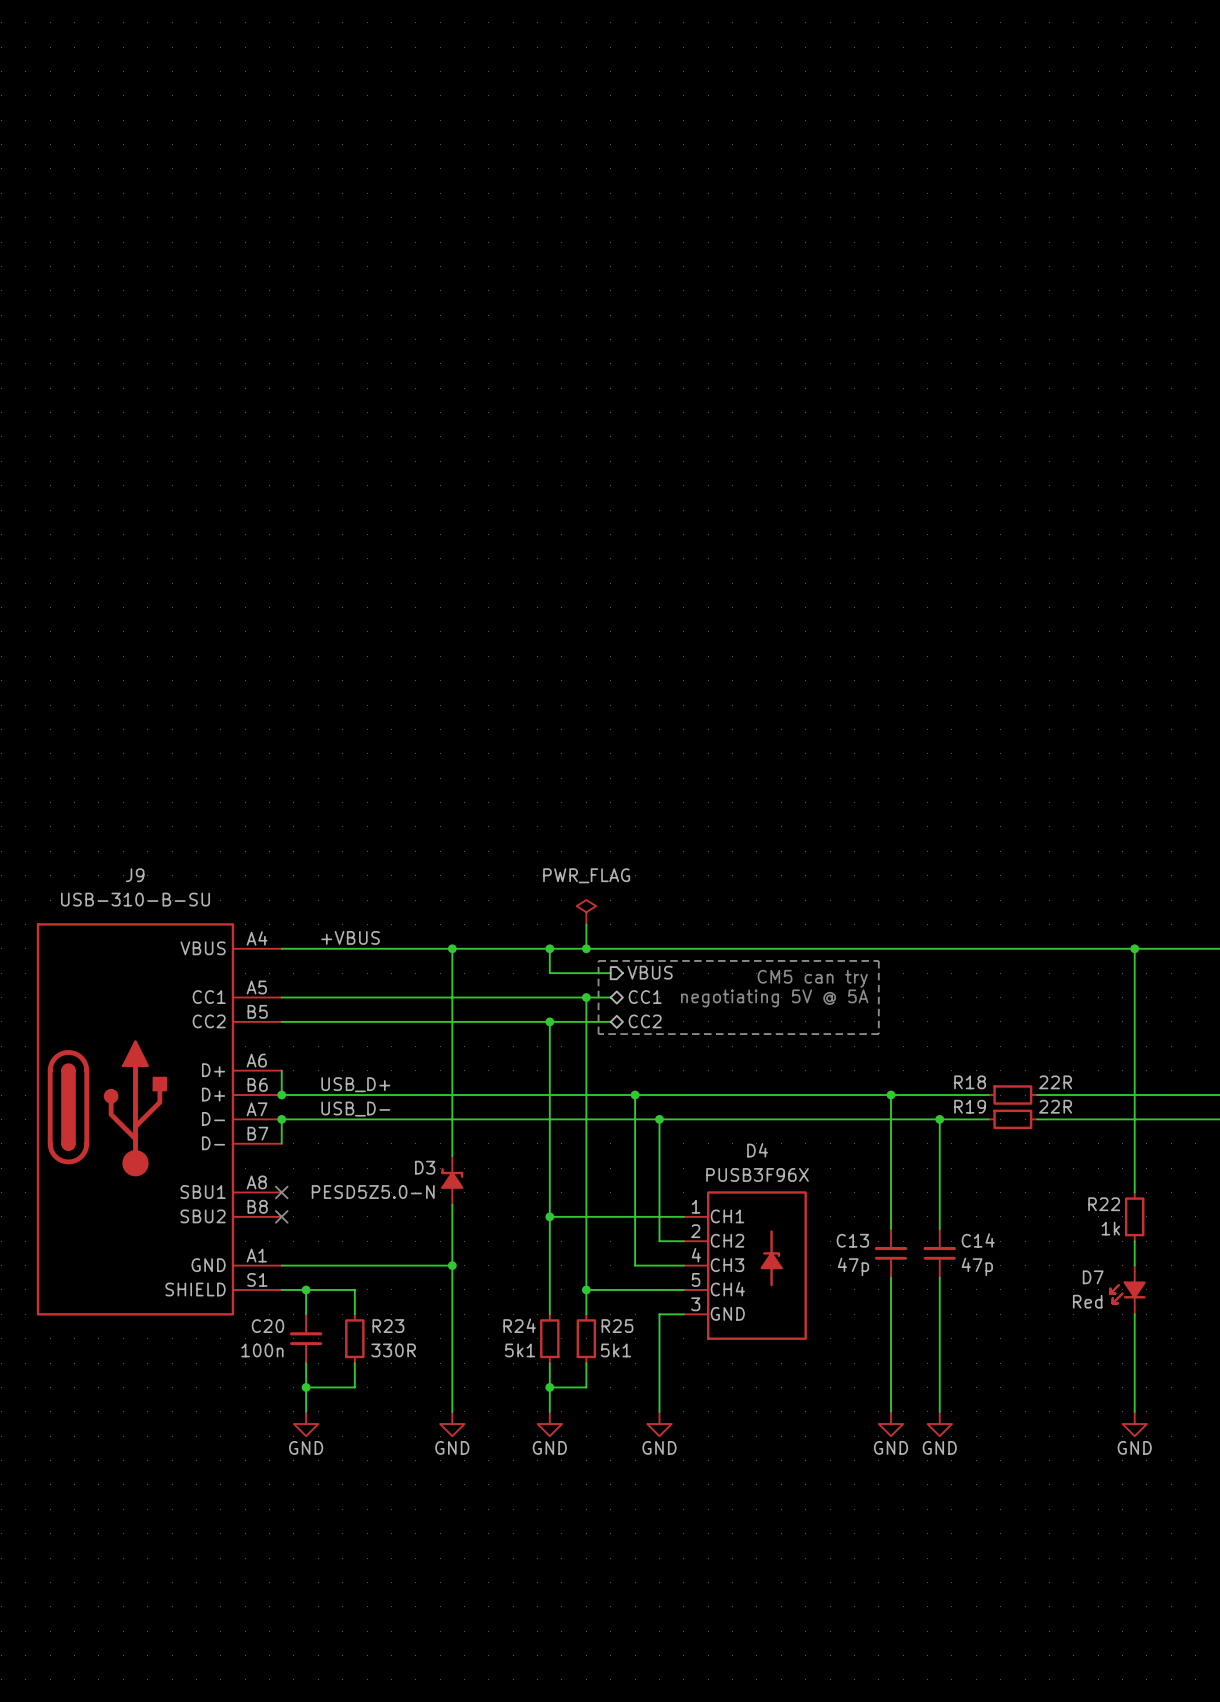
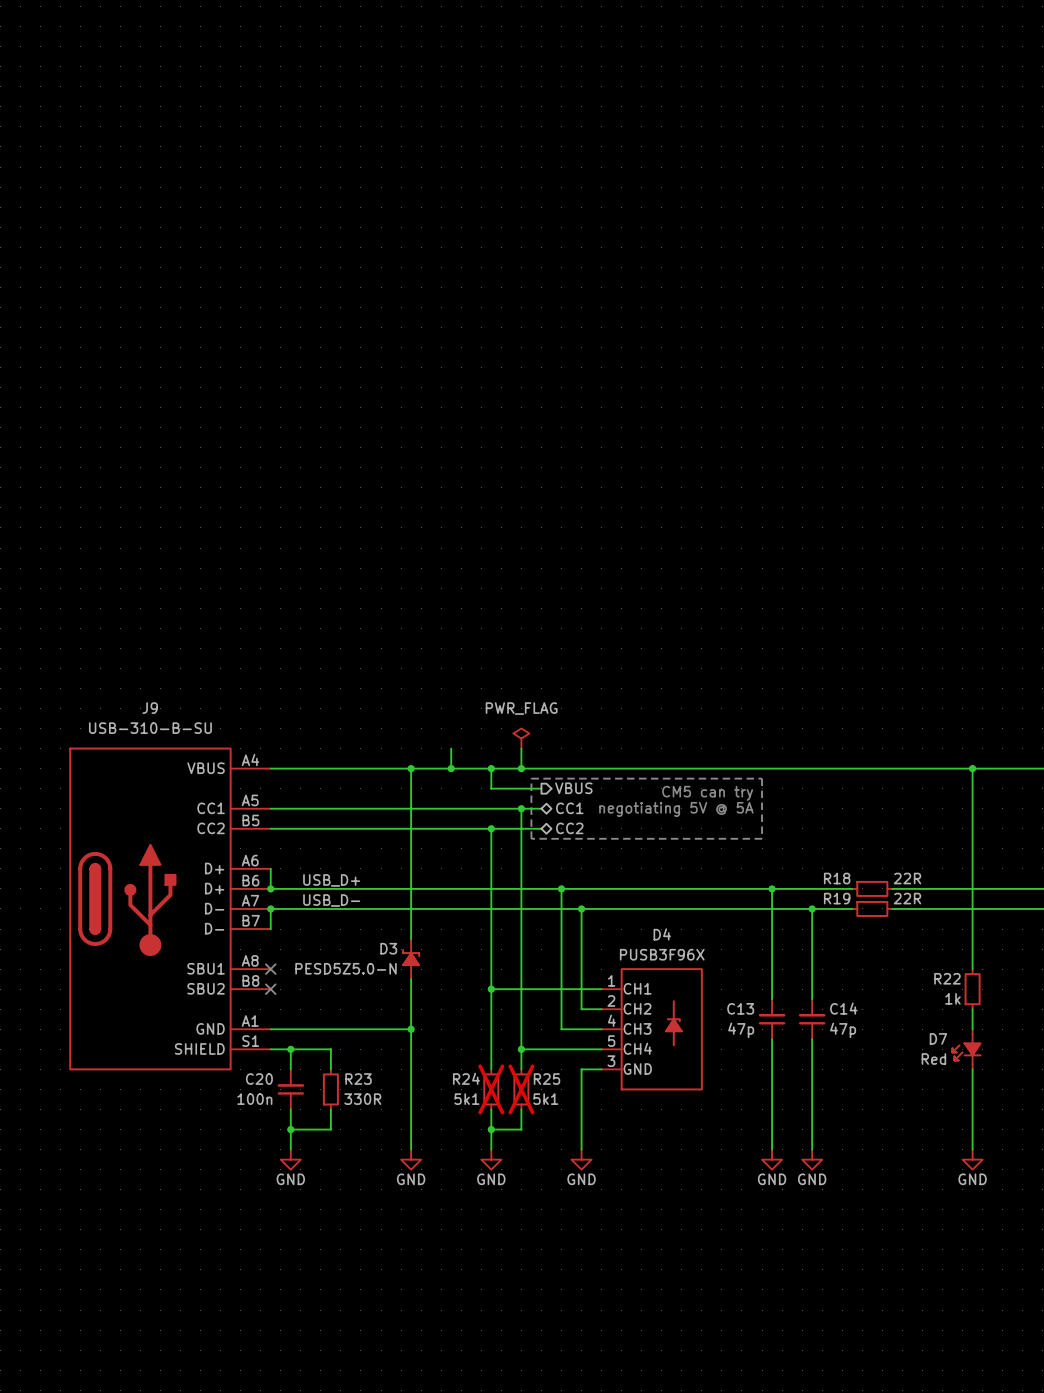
wire: none -> (451, 748) (451, 768)
label: +VBUS (350, 937) -> none
junction: none -> (451, 768)
R24 do-not-place cross: none -> (491, 1089)
R25 do-not-place cross: none -> (521, 1089)

